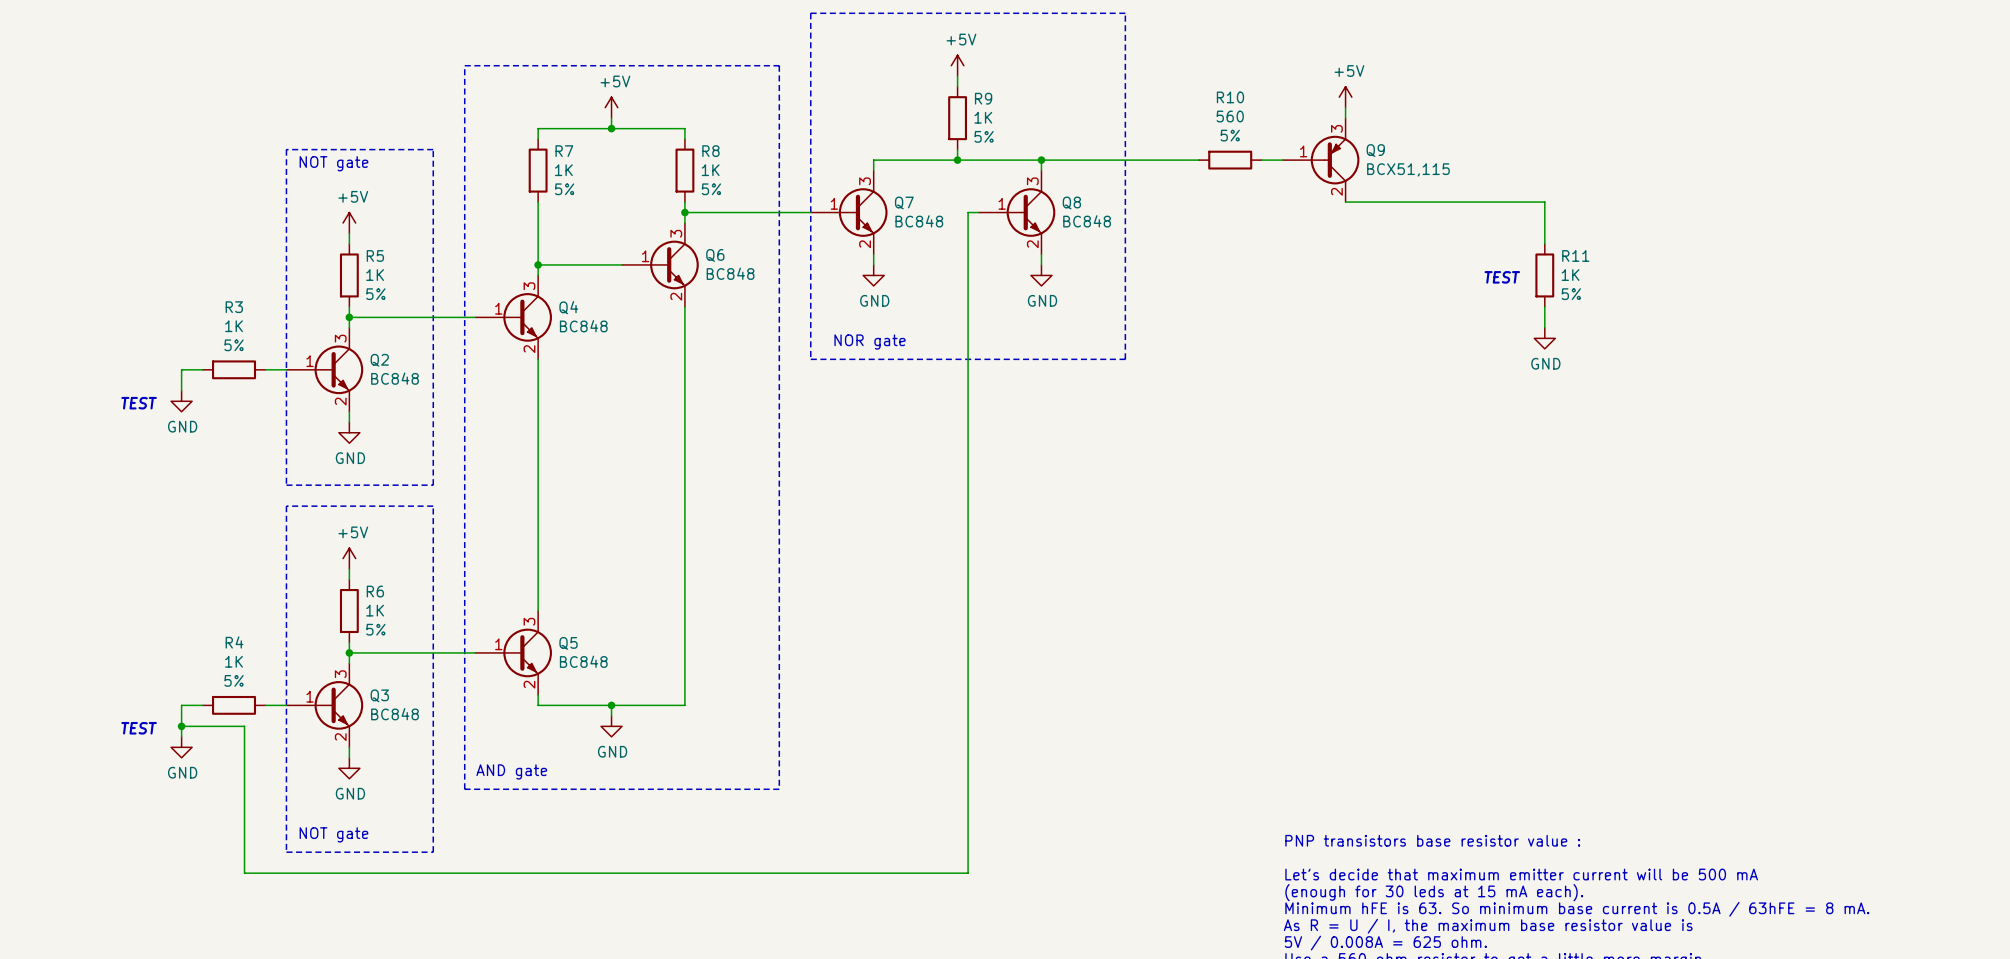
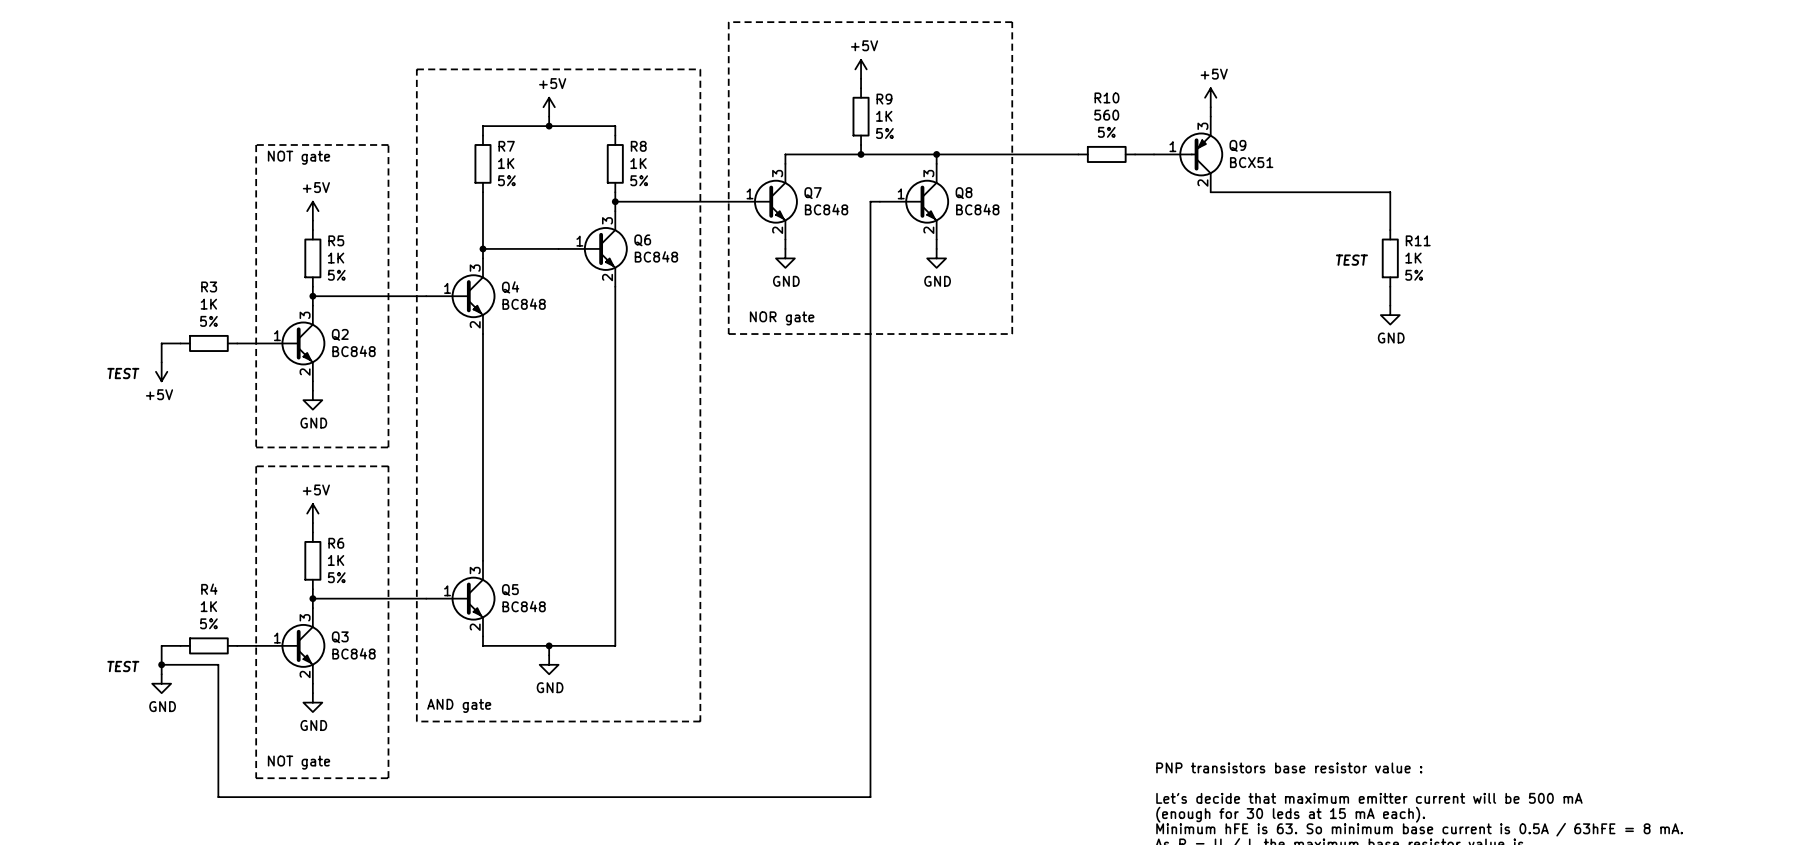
Q9 value: BCX51,115 (1408, 169) -> BCX51 (1251, 162)
power symbol: GND (181, 401) -> +5V (161, 371)

